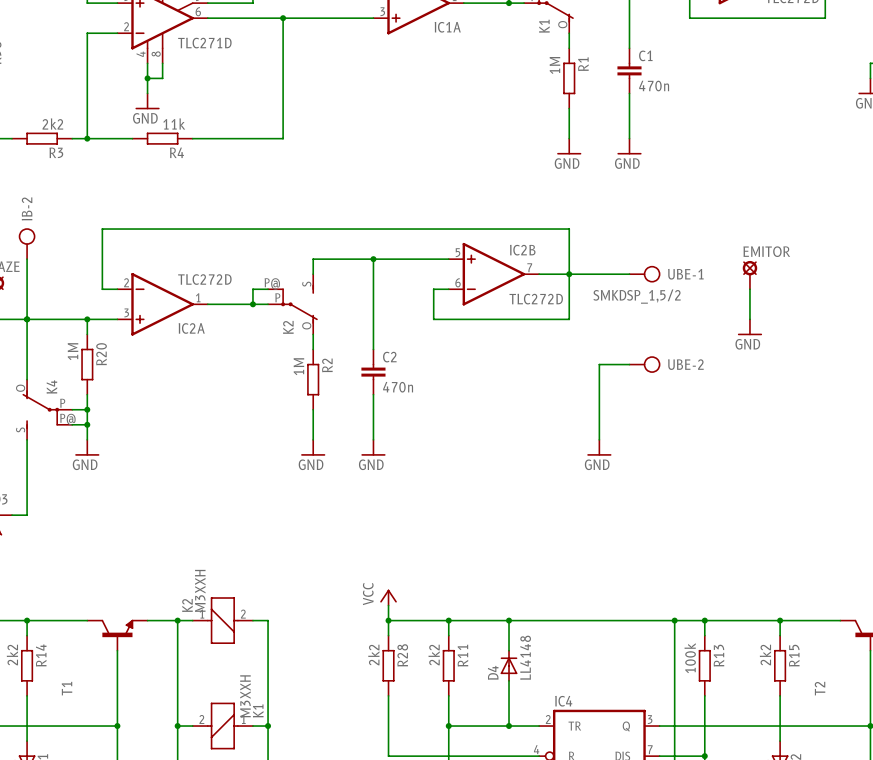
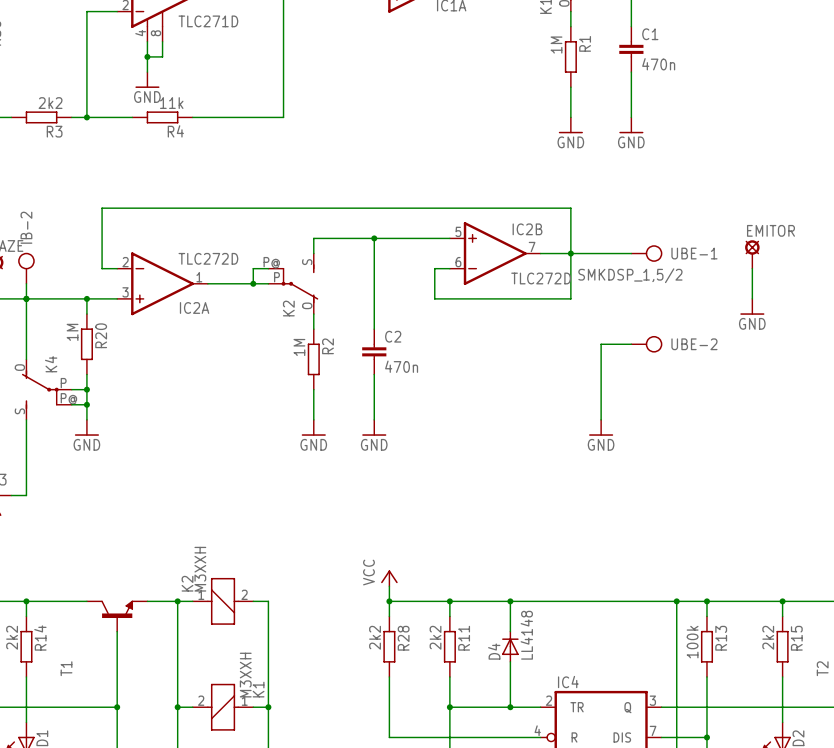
IB-2 position: (27, 243) -> (26, 268)
wire: (27, 259) (27, 304) -> none

